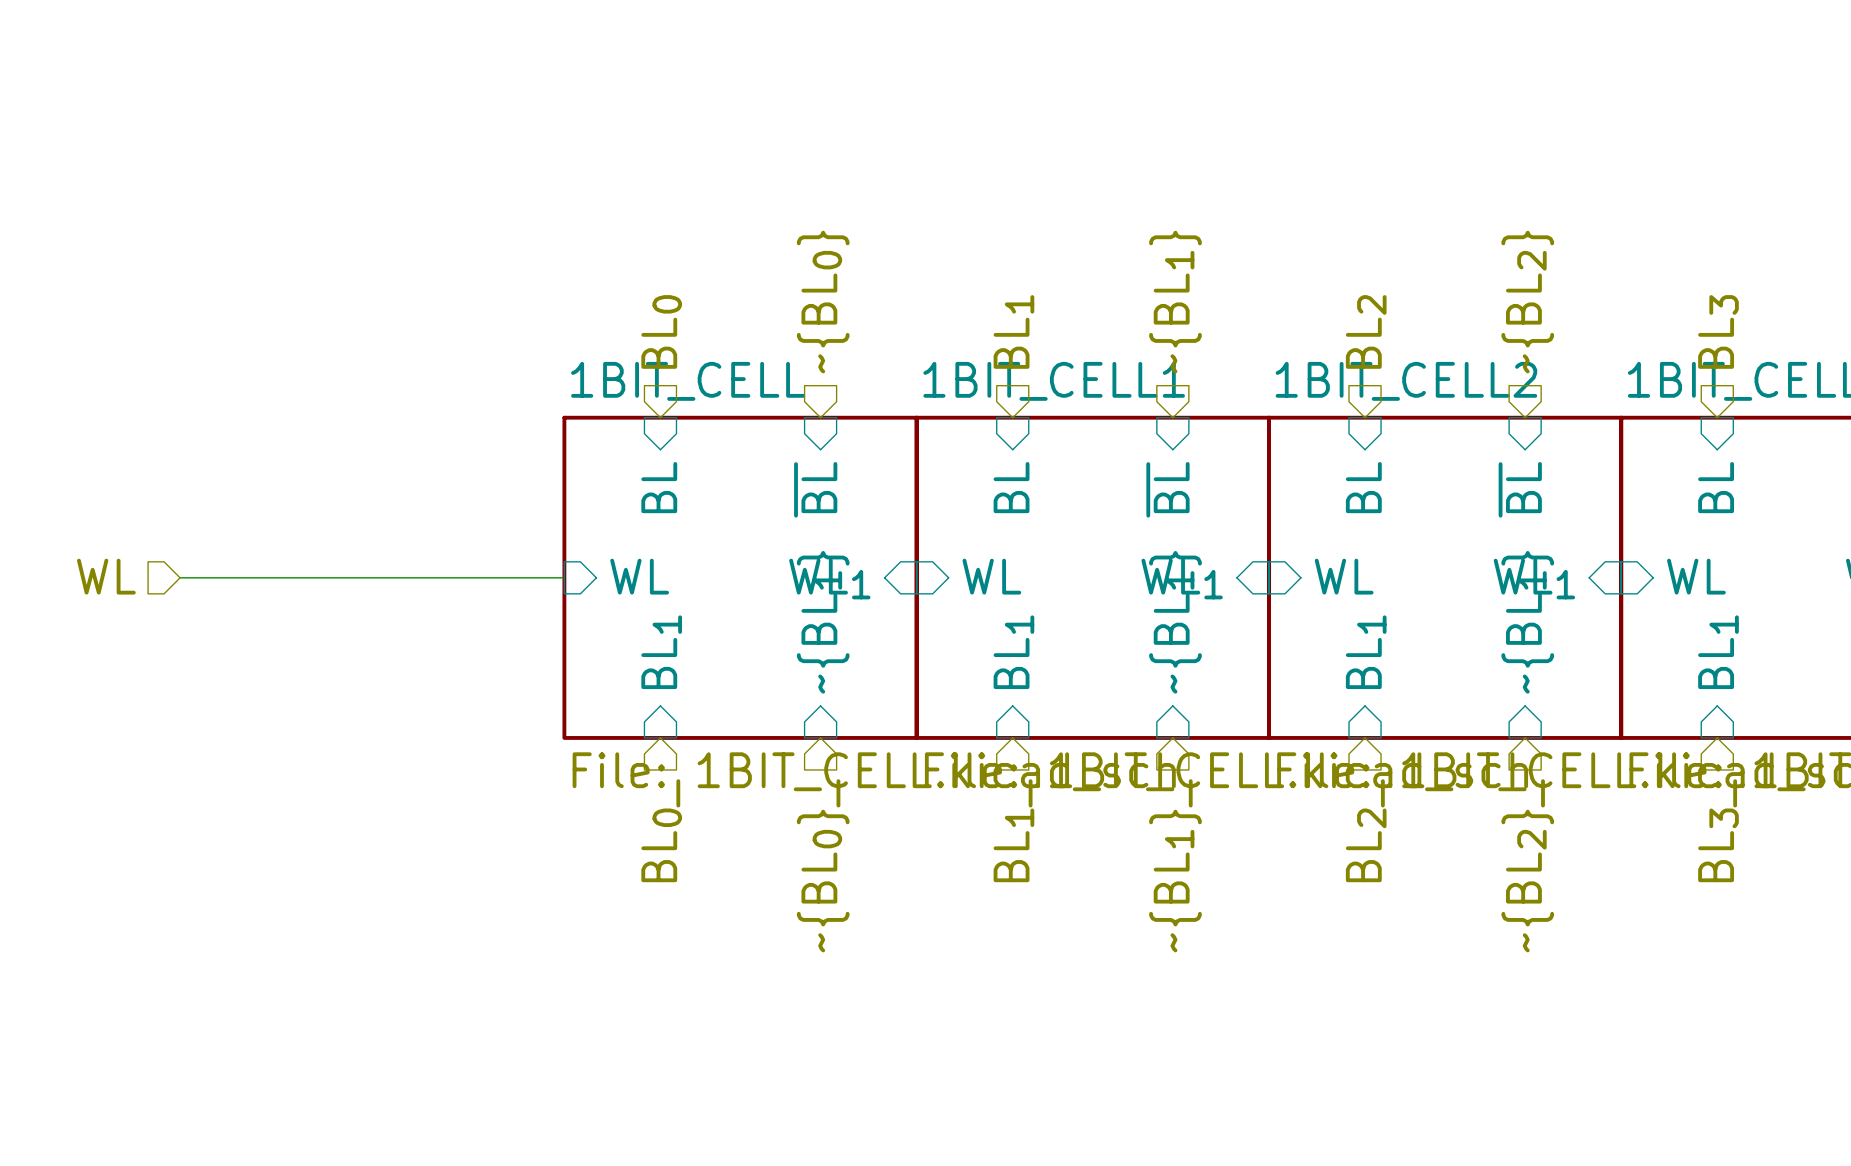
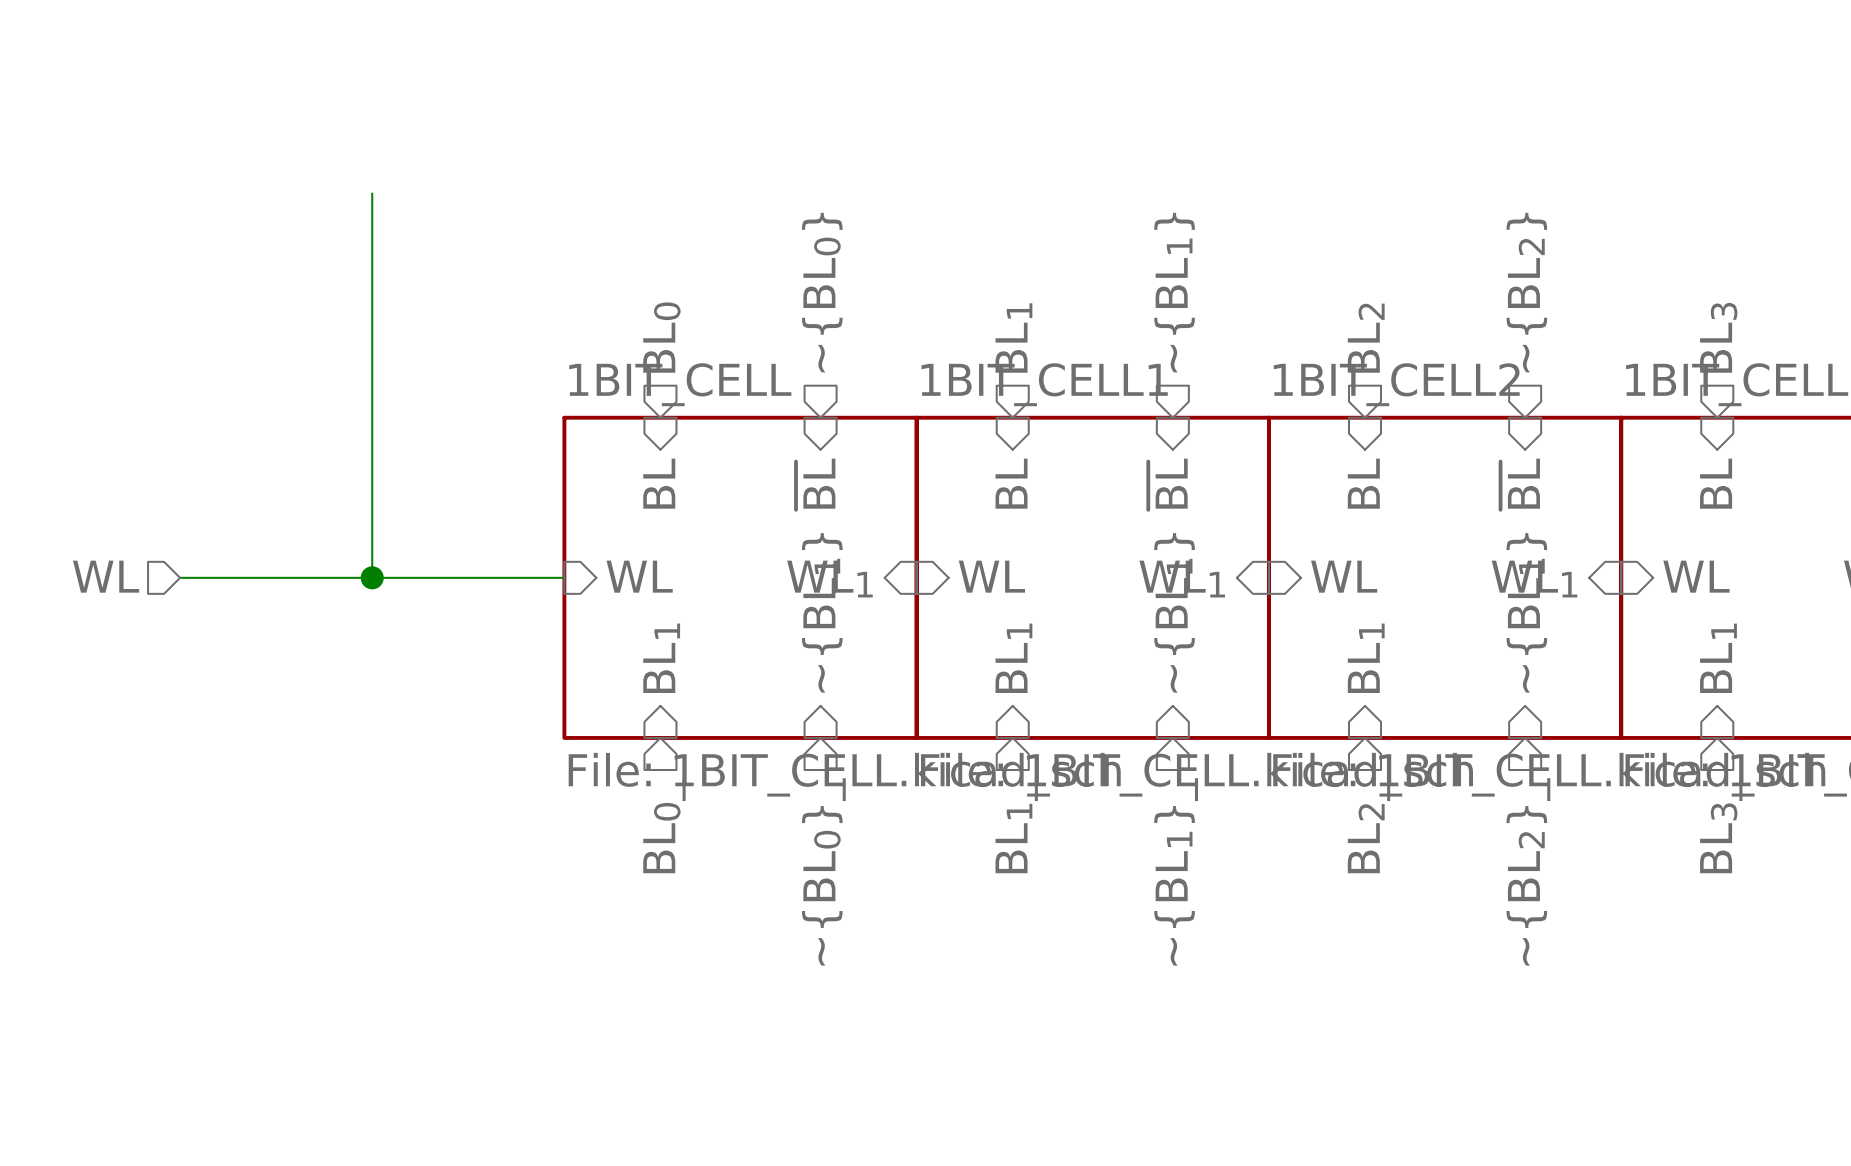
wire: none -> (372, 193) (372, 577)
junction: none -> (372, 577)

